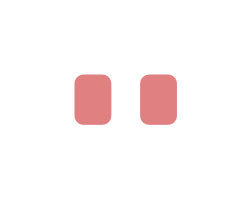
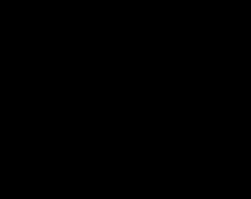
part: (125, 99) -> none

